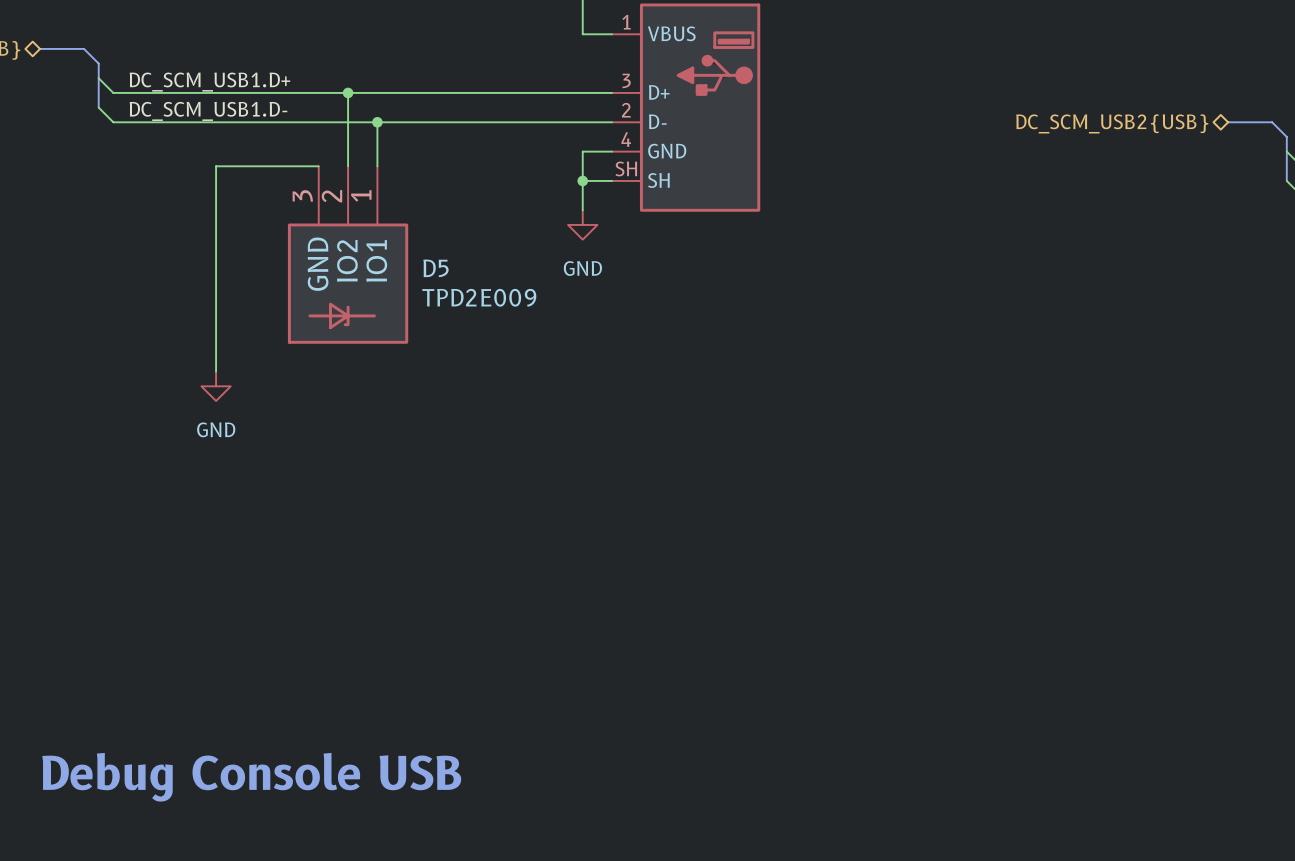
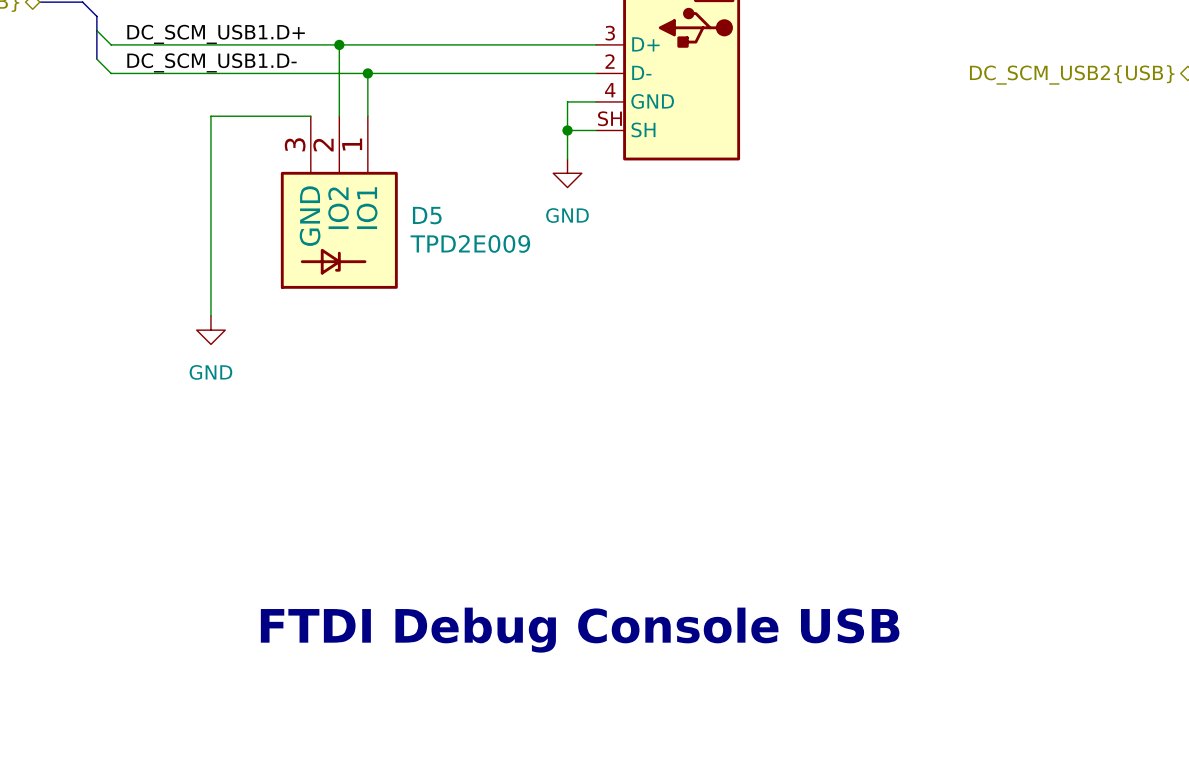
text: none -> FTDI Debug Console USB (580, 630)
text: Debug Console USB (251, 777) -> none

